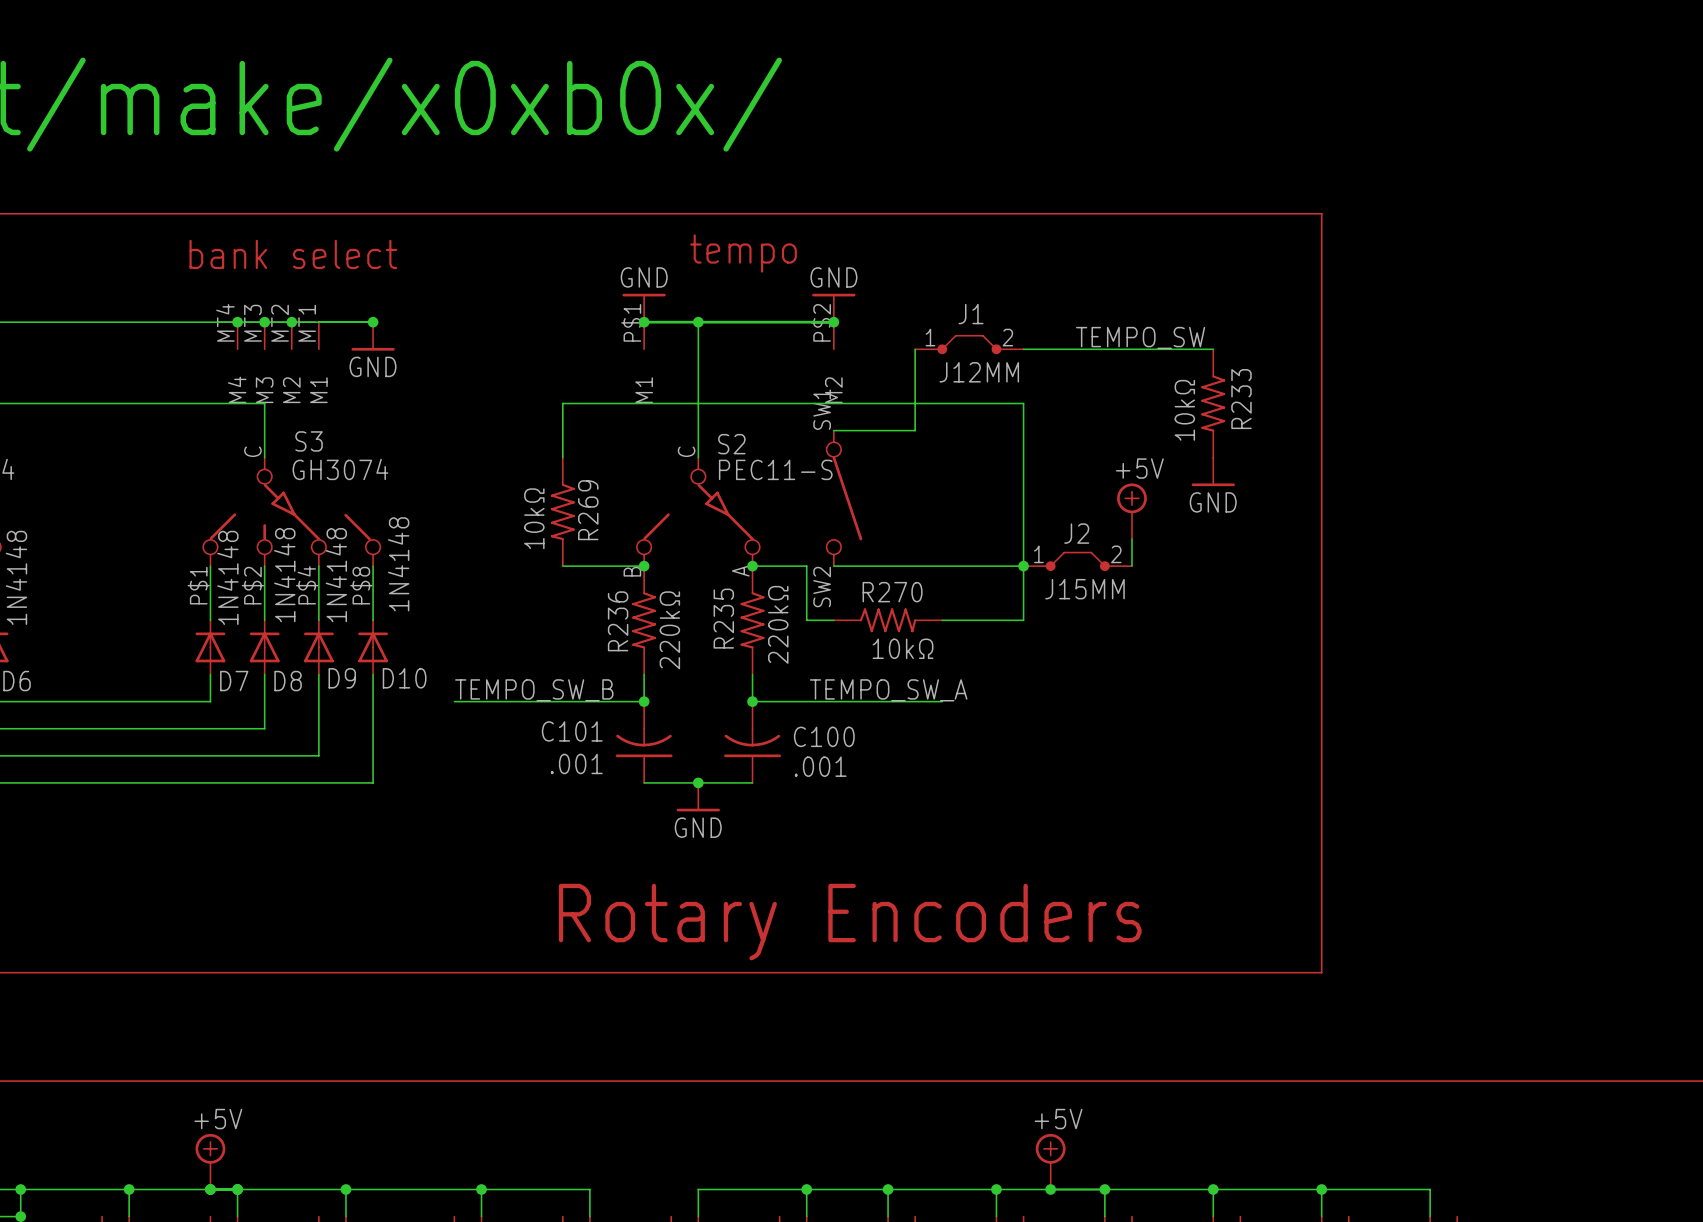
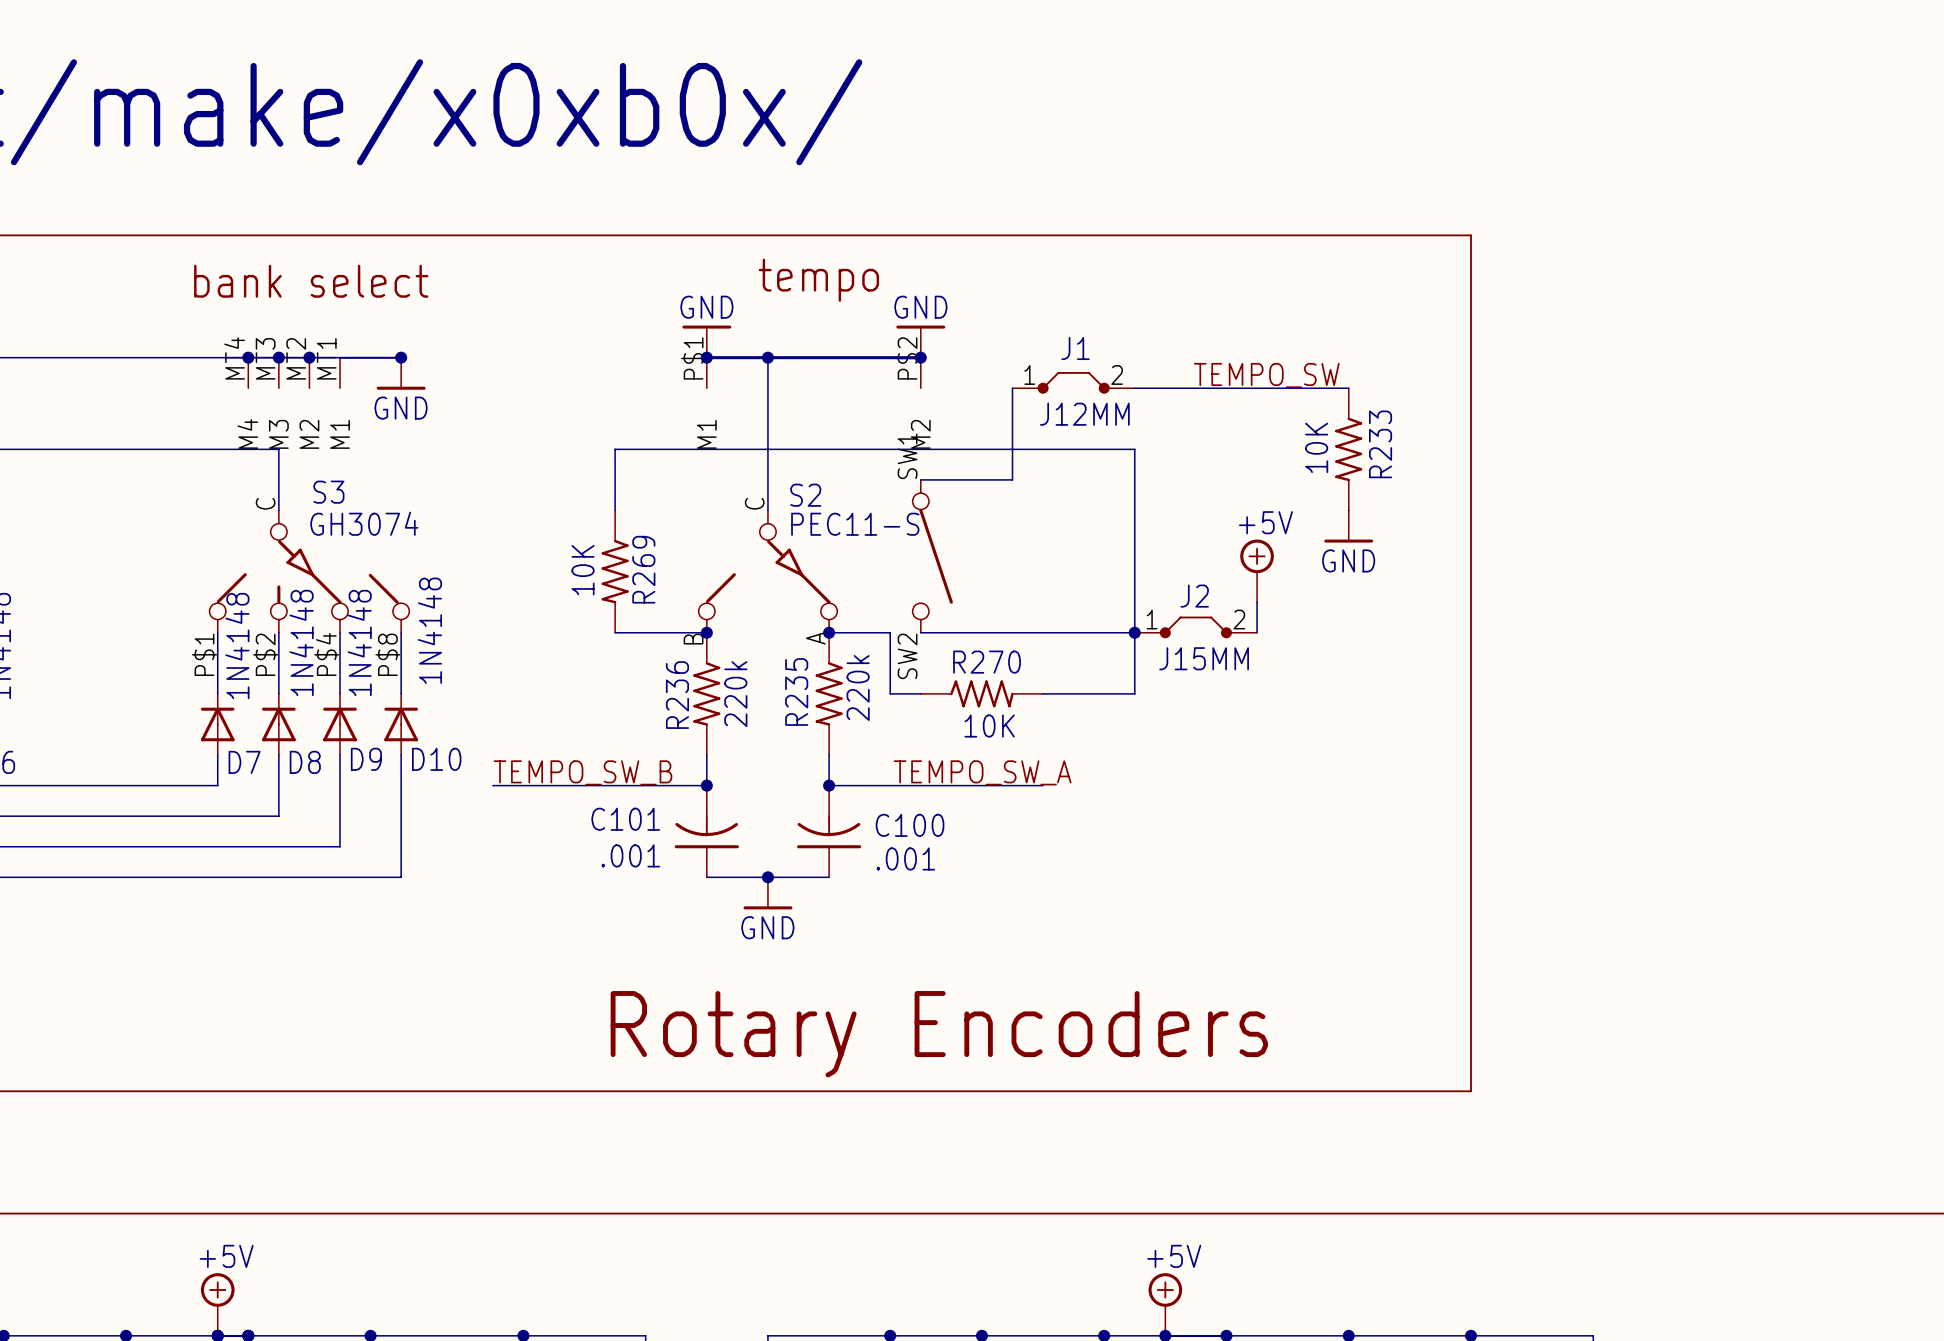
R233 value: 10kΩ (1184, 410) -> 10K (1316, 447)
R269 value: 10kΩ (534, 518) -> 10K (583, 570)
R235 value: 220kΩ (778, 624) -> 220k (858, 688)
R236 value: 220kΩ (669, 630) -> 220k (735, 694)
R270 value: 10kΩ (903, 648) -> 10K (989, 726)

